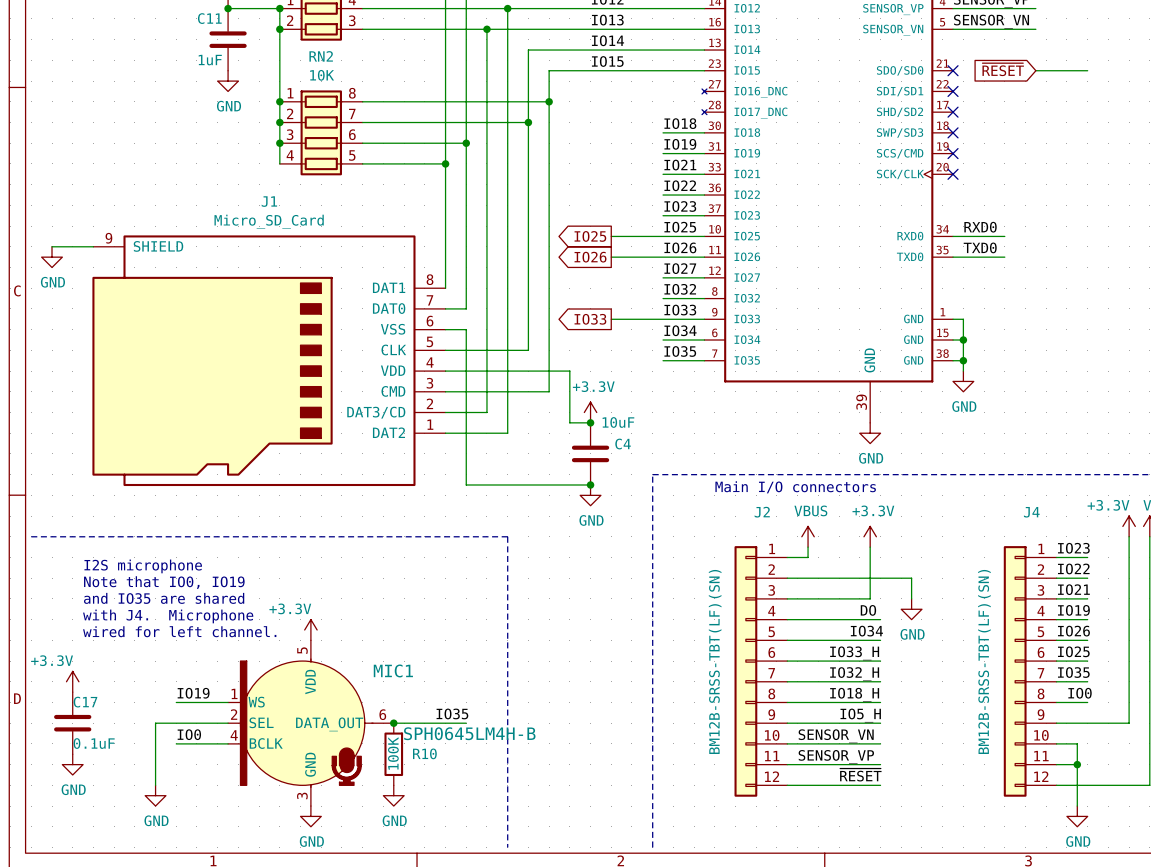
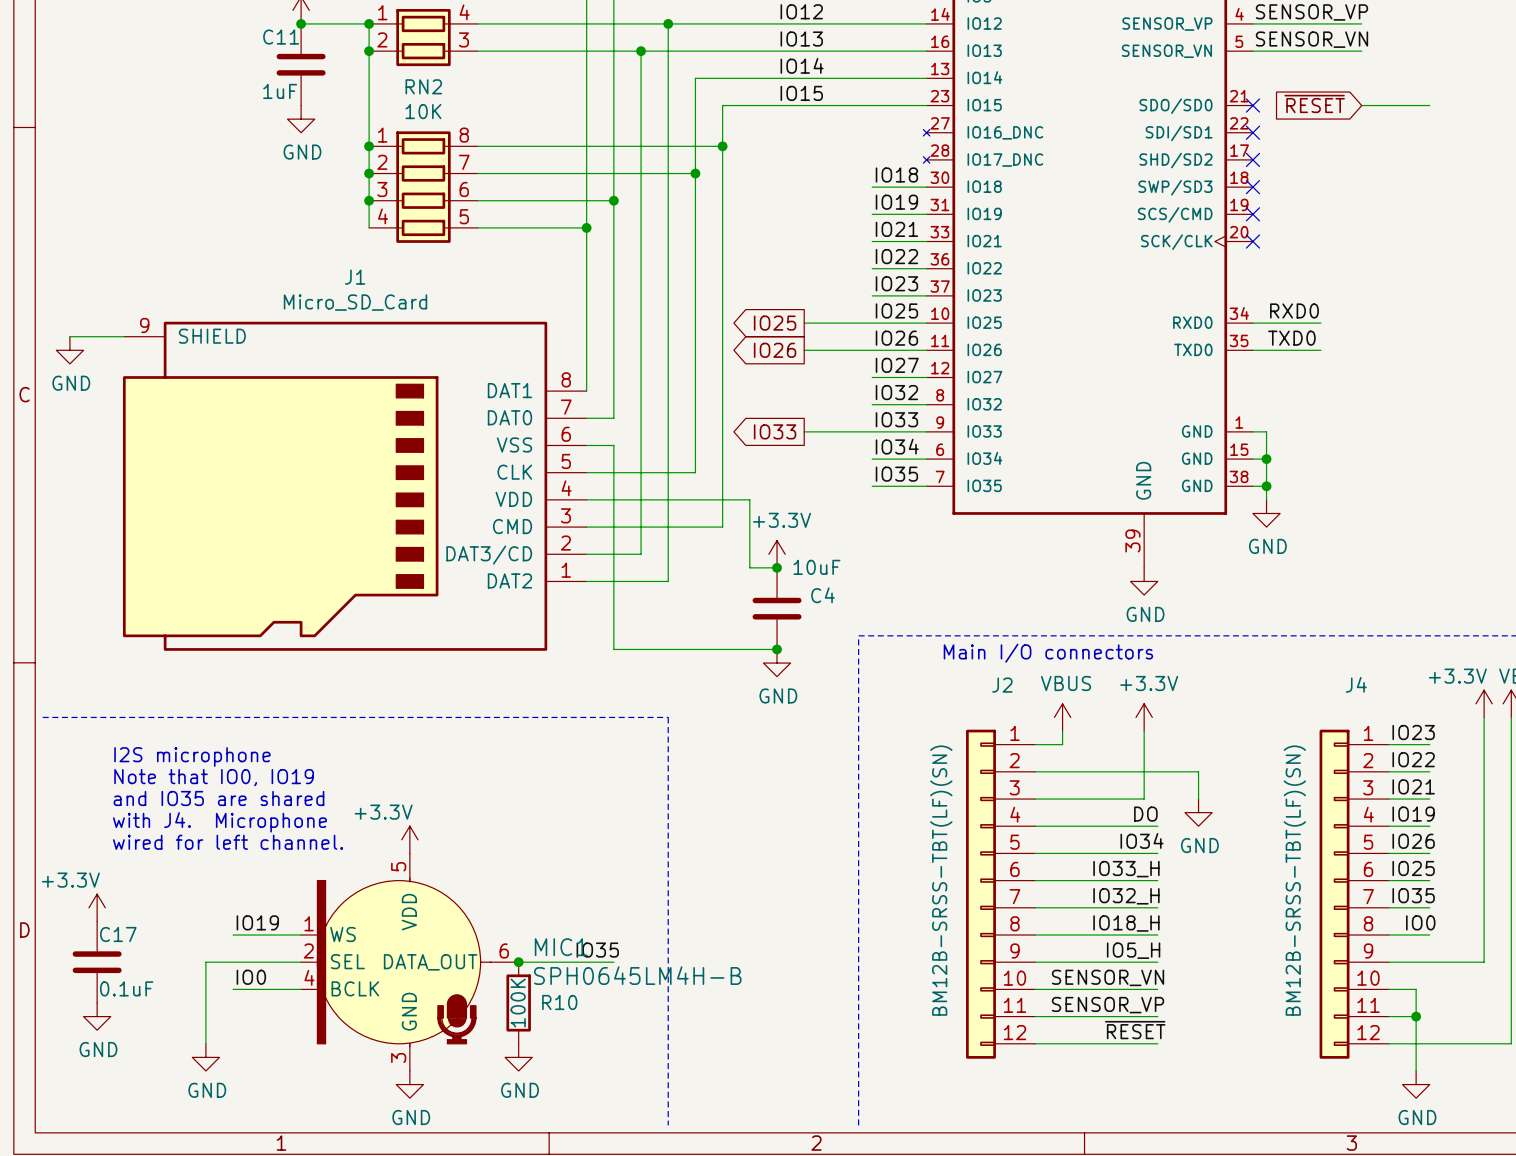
MIC1 name position: MIC1 (393, 670) -> MIC1 (561, 947)

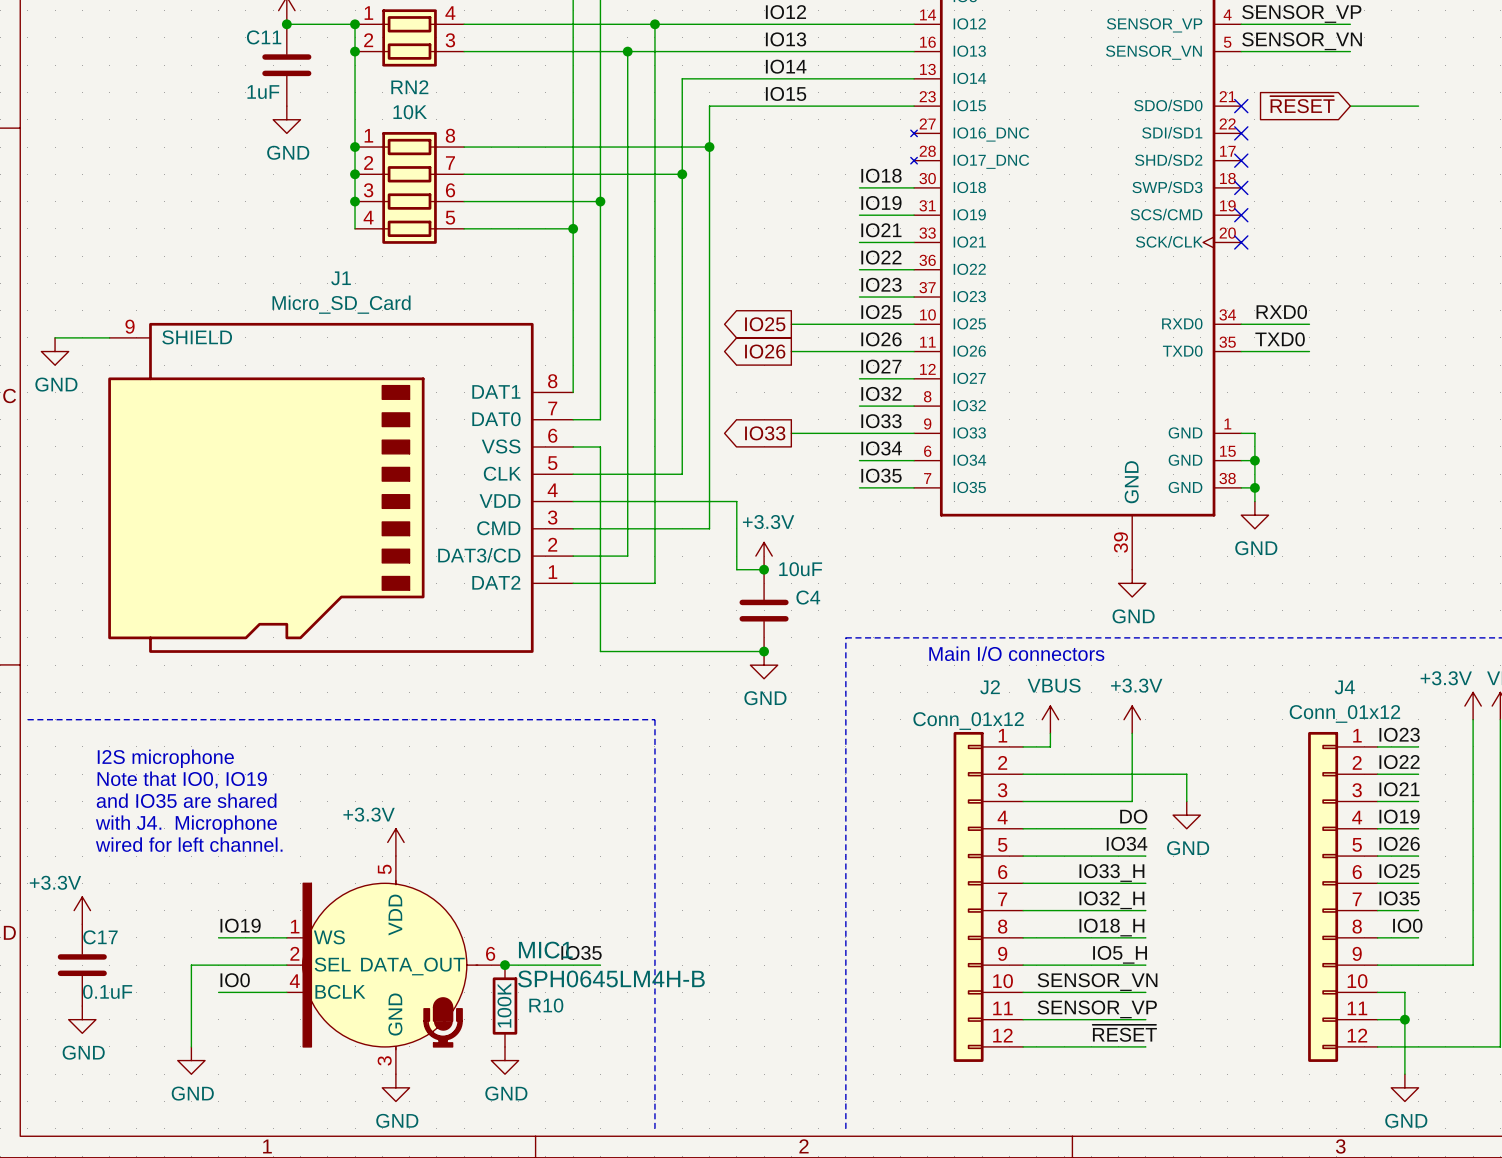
J2 value: BM12B-SRSS-TBT(LF)(SN) (941, 880) -> Conn_01x12 (968, 721)
J4 value: BM12B-SRSS-TBT(LF)(SN) (1294, 880) -> Conn_01x12 (1344, 713)

